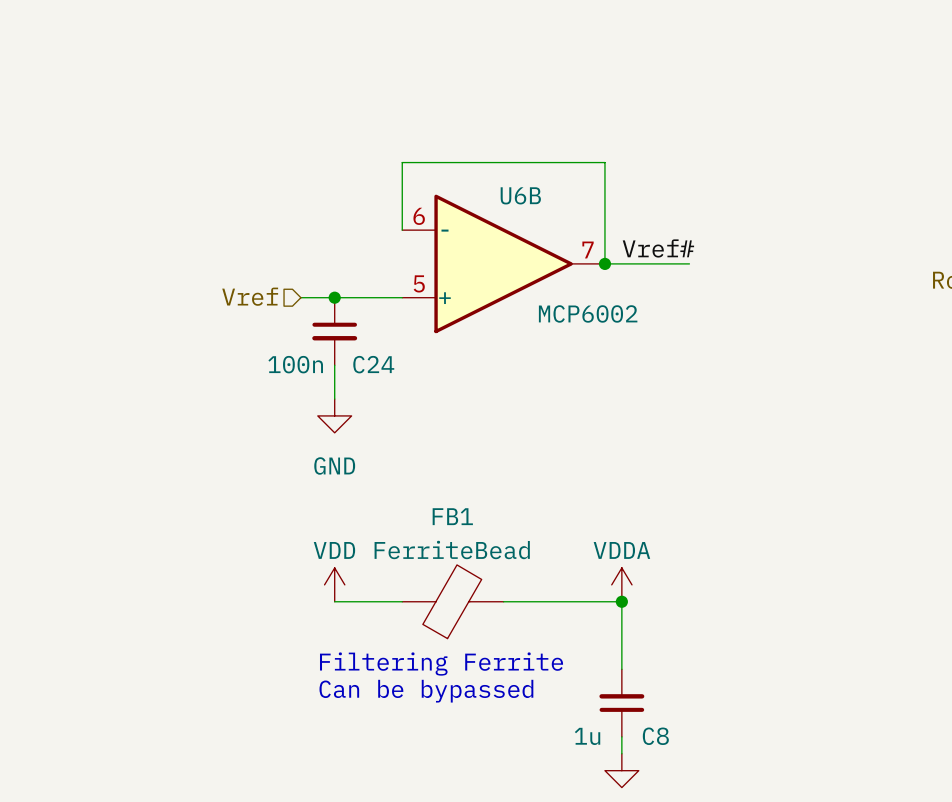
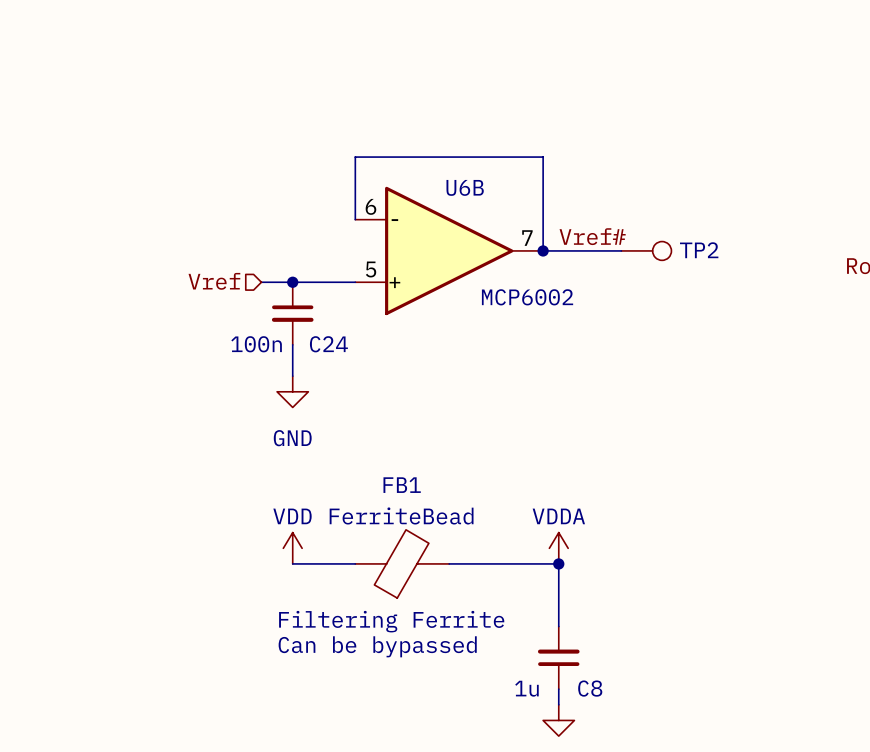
TP2: none -> (646, 250)

